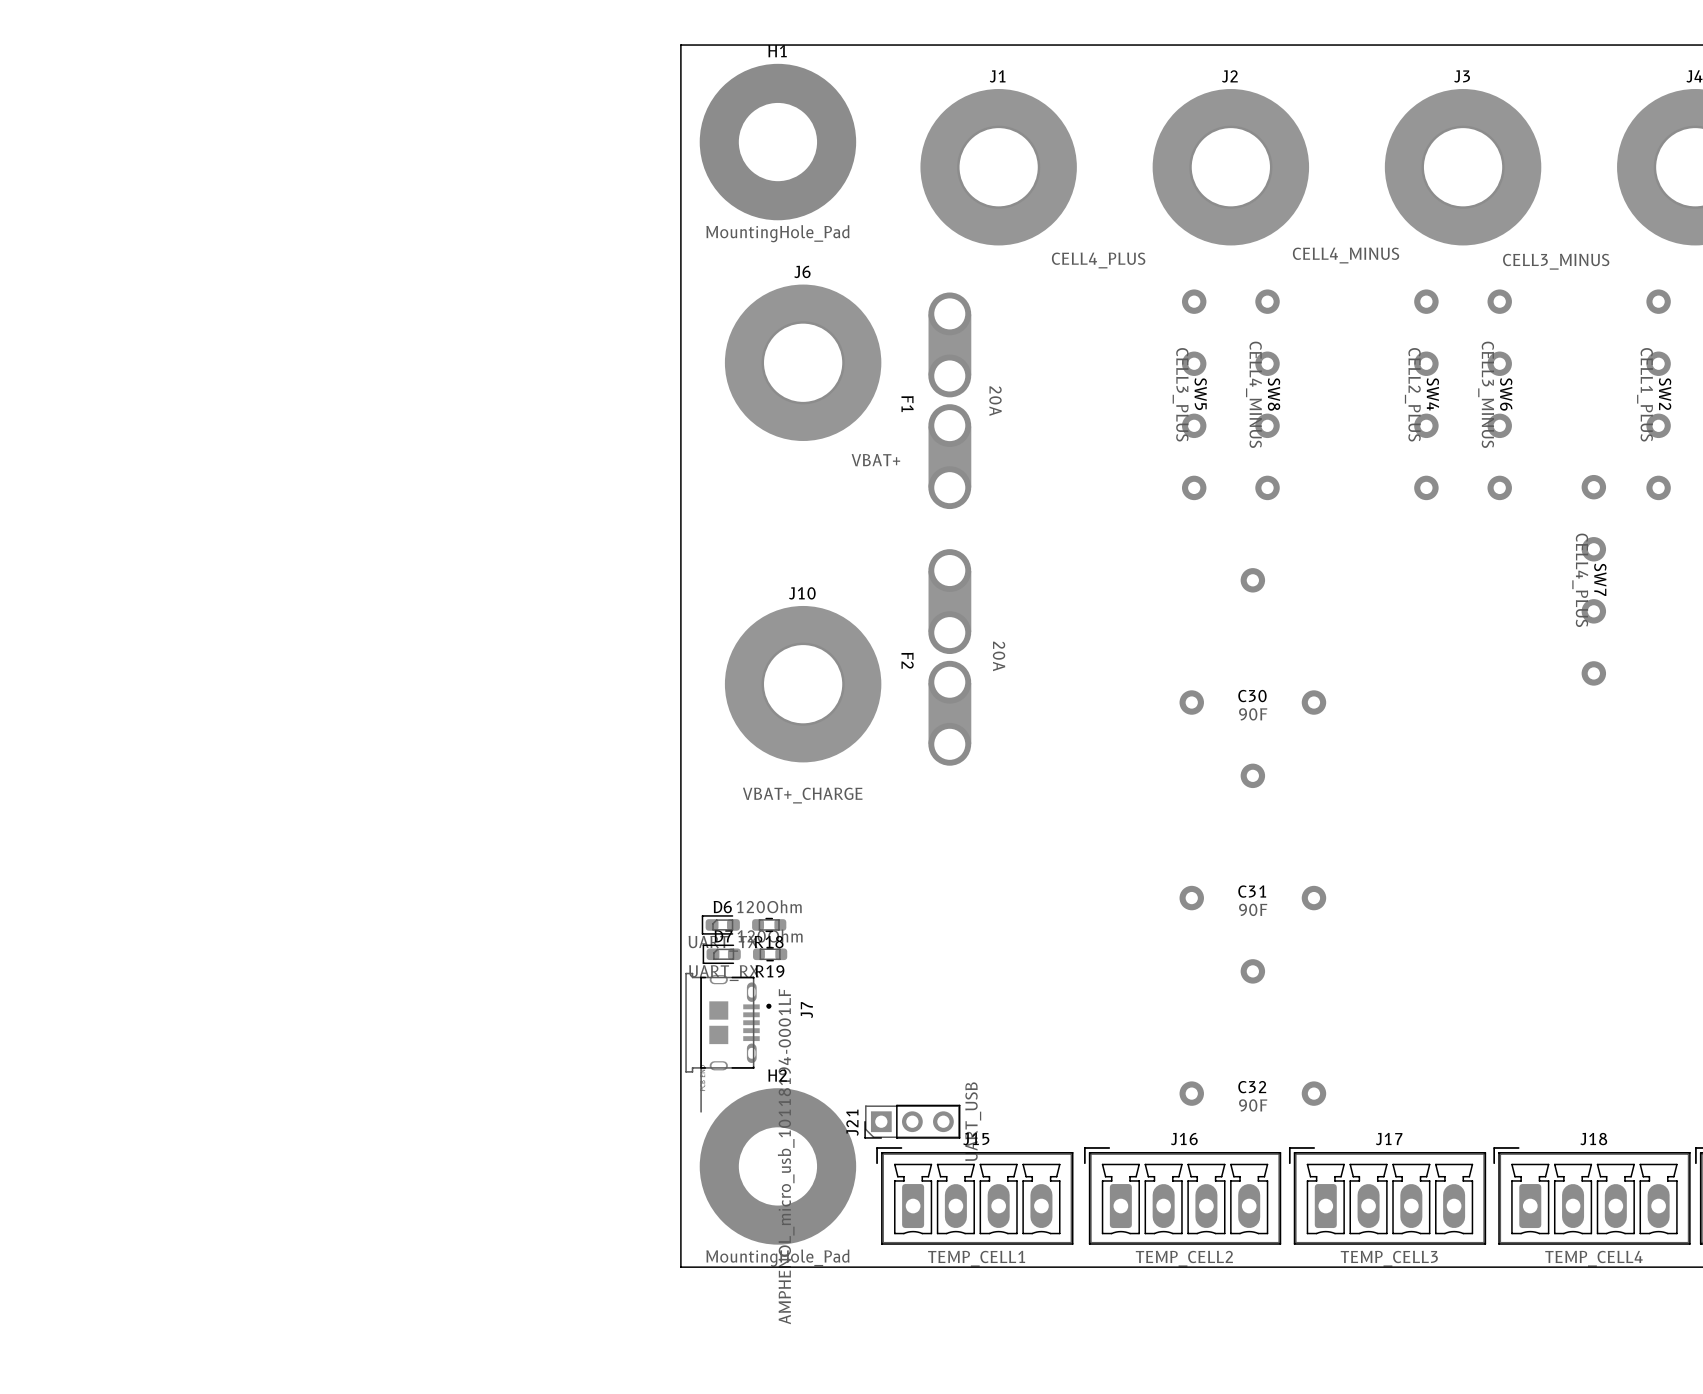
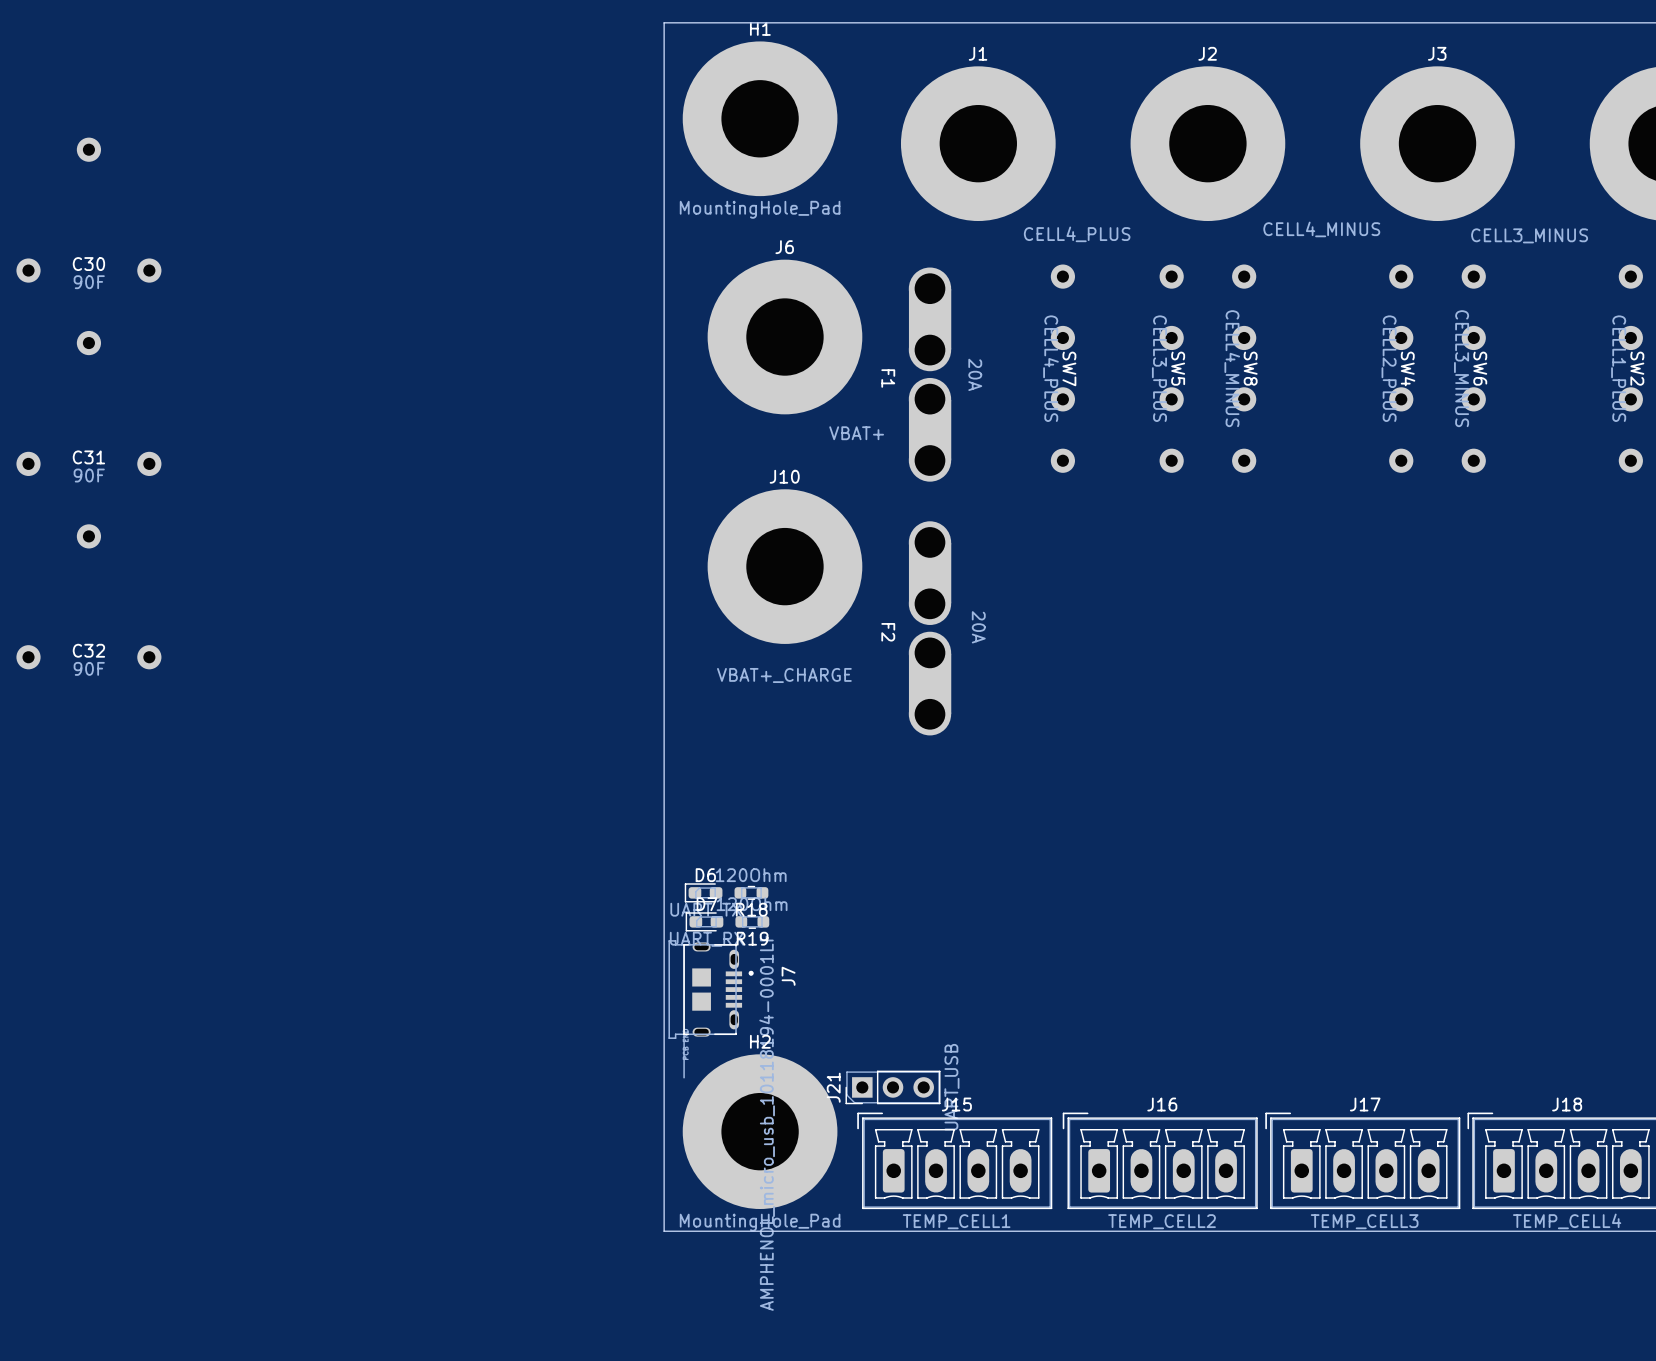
SW7 position: (1593, 580) -> (1062, 368)
C30 position: (1252, 641) -> (88, 210)
J10 position: (803, 684) -> (784, 566)
C31 position: (1252, 836) -> (88, 403)
C32 position: (1252, 1032) -> (88, 596)

